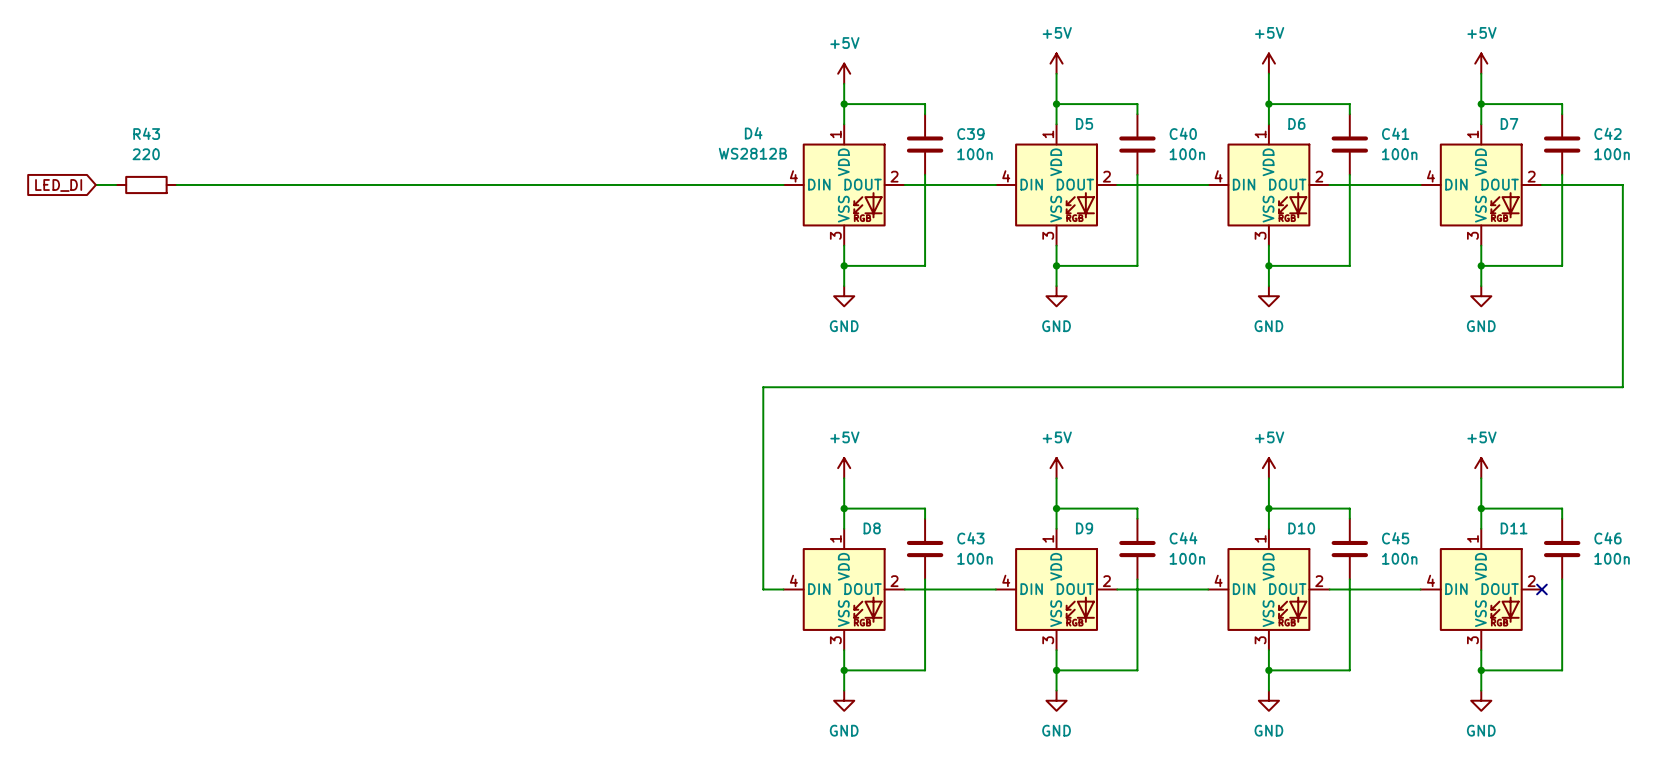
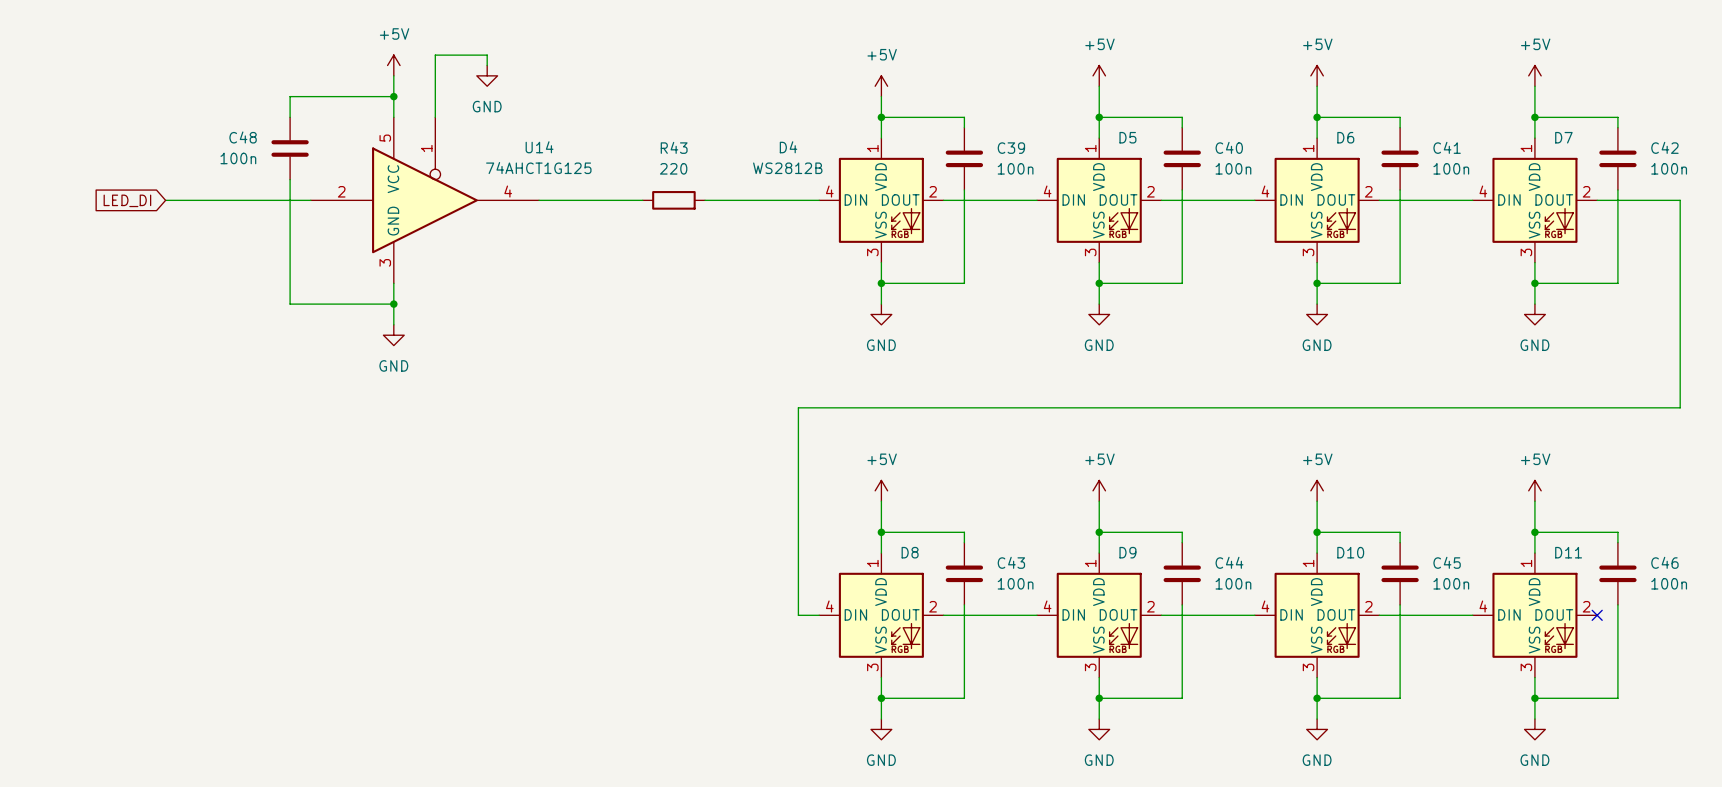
power symbol: none -> +5V (393, 65)
wire: none -> (487, 65) (487, 55) (435, 55) (435, 117)
wire: none -> (393, 75) (393, 117)
power symbol: none -> GND (487, 75)
wire: none -> (393, 96) (290, 96) (290, 117)
junction: none -> (393, 96)
C48: none -> 100n (290, 148)
wire: none -> (290, 179) (290, 304) (393, 304)
wire: (95, 184) (116, 184) -> none
wire: none -> (165, 200) (196, 200)
R43 position: (146, 184) -> (673, 200)
U14: none -> 74AHCT1G125 (424, 200)
wire: (611, 184) (672, 184) -> none
global label position: LED_DI (58, 185) -> LED_DI (127, 200)
wire: none -> (393, 283) (393, 324)
junction: none -> (393, 304)
power symbol: none -> GND (393, 335)

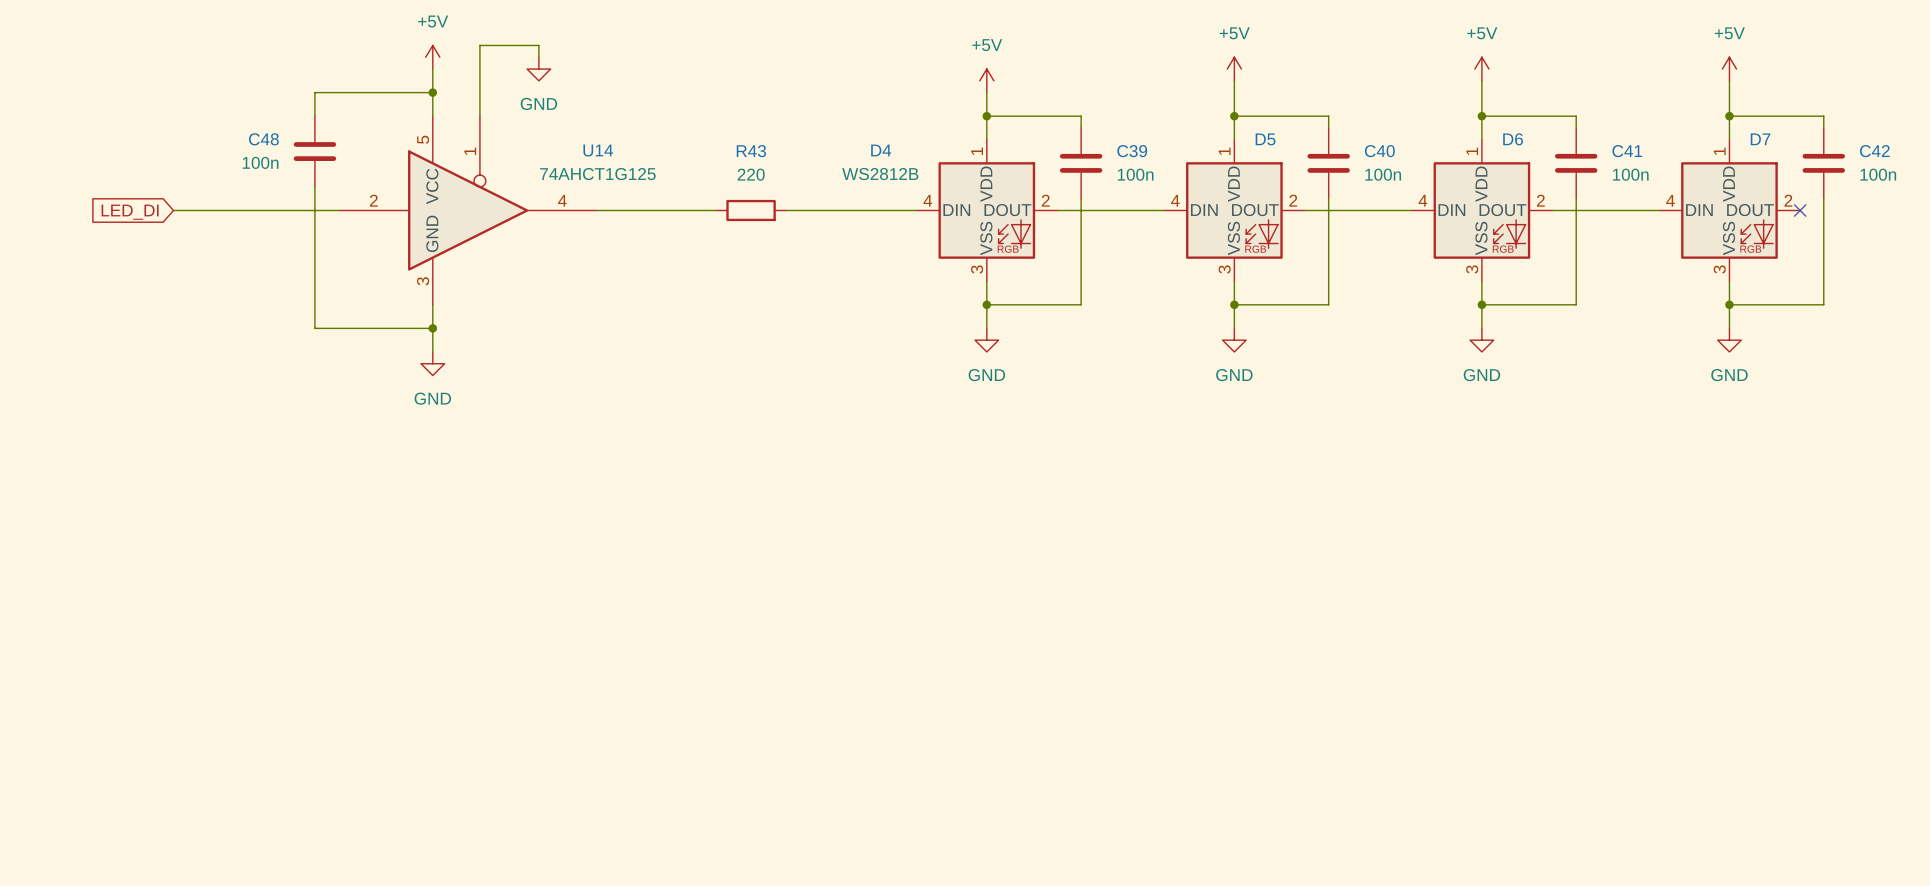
wire: (1597, 200) (1680, 200) (1680, 407) (798, 407) (798, 615) (819, 615) -> none
no-connect mark: none -> (1800, 210)
power symbol: +5V (881, 490) -> none
power symbol: +5V (1099, 490) -> none
power symbol: +5V (1317, 490) -> none
power symbol: +5V (1534, 490) -> none
wire: (881, 501) (881, 553) -> none
wire: (1099, 501) (1099, 553) -> none
wire: (1317, 501) (1317, 553) -> none
wire: (1534, 501) (1534, 553) -> none
wire: (881, 532) (964, 532) (964, 542) -> none
junction: (881, 532) -> none
wire: (1099, 532) (1182, 532) (1182, 542) -> none
junction: (1099, 532) -> none
wire: (1317, 532) (1400, 532) (1400, 542) -> none
junction: (1317, 532) -> none
wire: (1534, 532) (1617, 532) (1617, 542) -> none
junction: (1534, 532) -> none
C43: 100n (964, 573) -> none
C44: 100n (1182, 573) -> none
C45: 100n (1400, 573) -> none
C46: 100n (1617, 573) -> none
wire: (964, 604) (964, 698) (881, 698) -> none
wire: (1182, 604) (1182, 698) (1099, 698) -> none
wire: (1400, 604) (1400, 698) (1317, 698) -> none
wire: (1617, 604) (1617, 698) (1534, 698) -> none
D8: (881, 615) -> none
wire: (943, 615) (1037, 615) -> none
D9: (1099, 615) -> none
wire: (1161, 615) (1254, 615) -> none
D10: (1317, 615) -> none
wire: (1379, 615) (1472, 615) -> none
D11: (1534, 615) -> none
no-connect mark: (1597, 615) -> none
wire: (881, 677) (881, 719) -> none
wire: (1099, 677) (1099, 719) -> none
wire: (1317, 677) (1317, 719) -> none
wire: (1534, 677) (1534, 719) -> none
junction: (881, 698) -> none
junction: (1099, 698) -> none
junction: (1317, 698) -> none
junction: (1534, 698) -> none
power symbol: GND (881, 729) -> none
power symbol: GND (1099, 729) -> none
power symbol: GND (1317, 729) -> none
power symbol: GND (1534, 729) -> none

